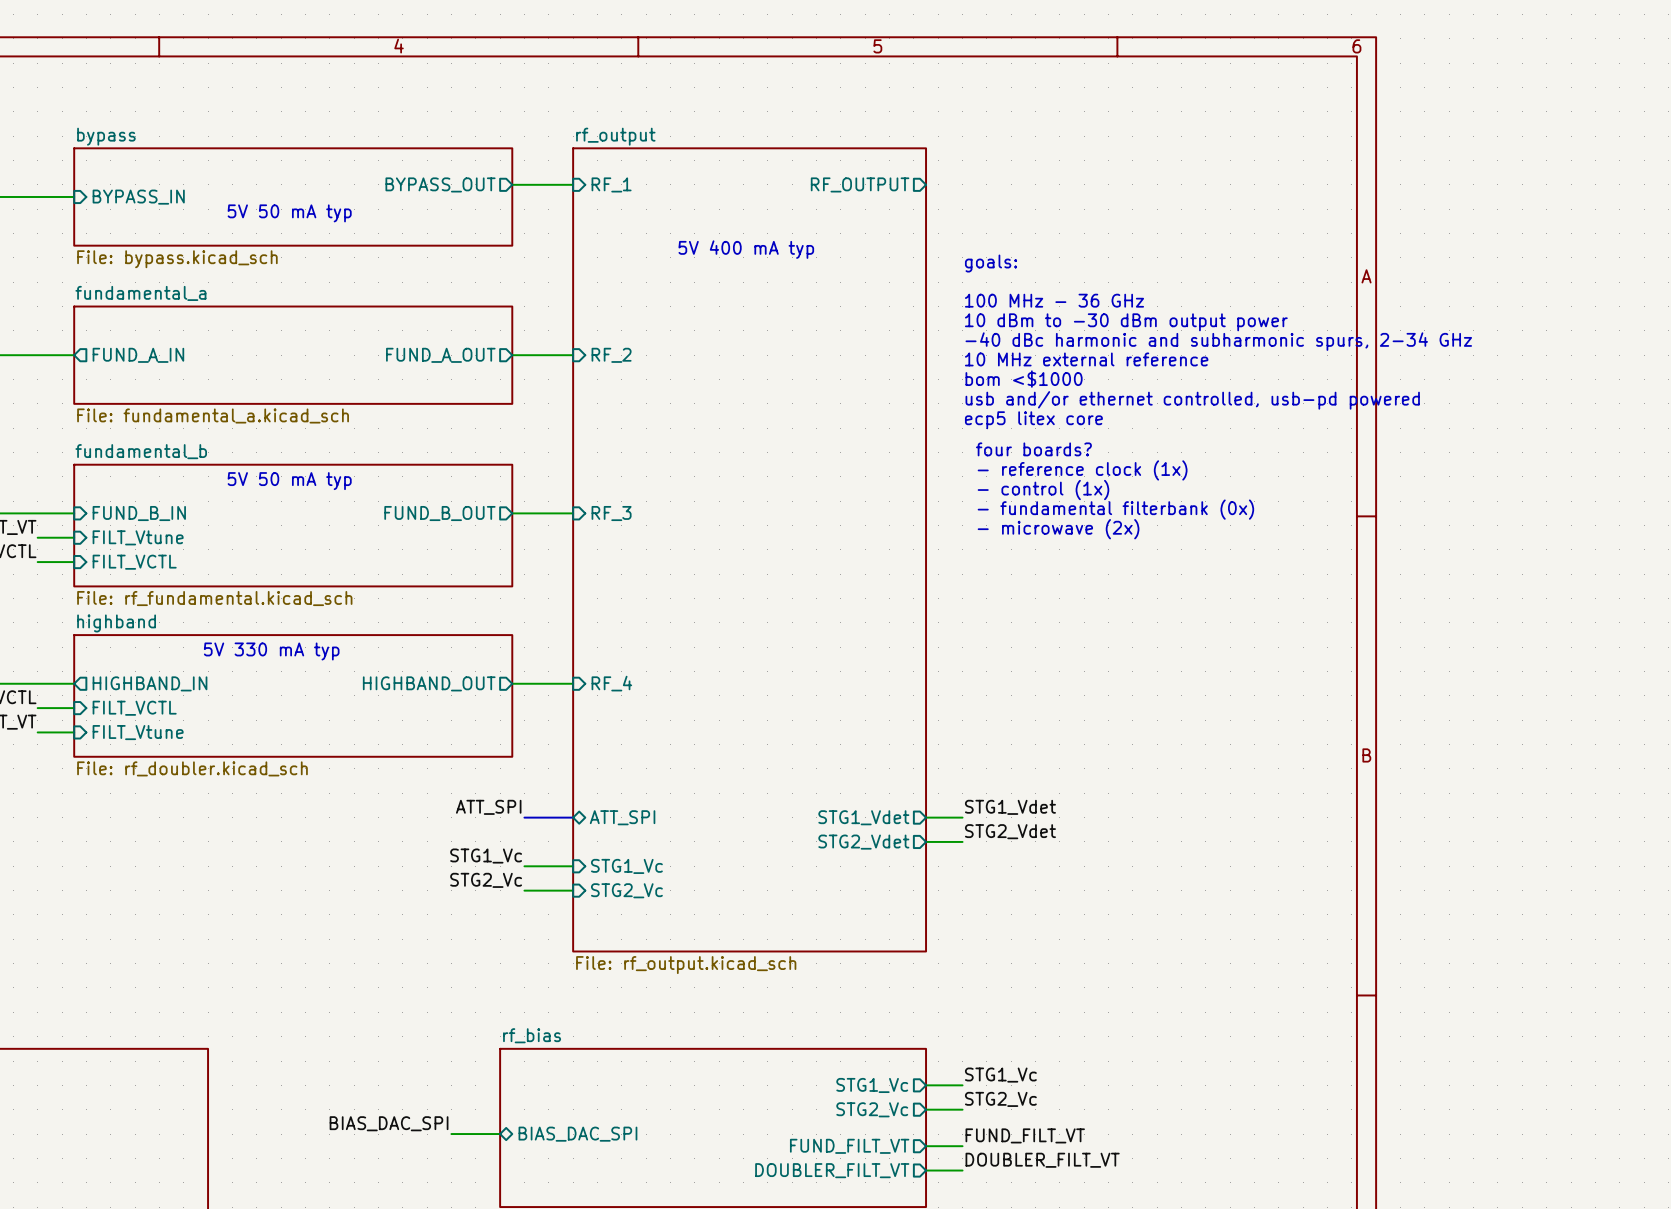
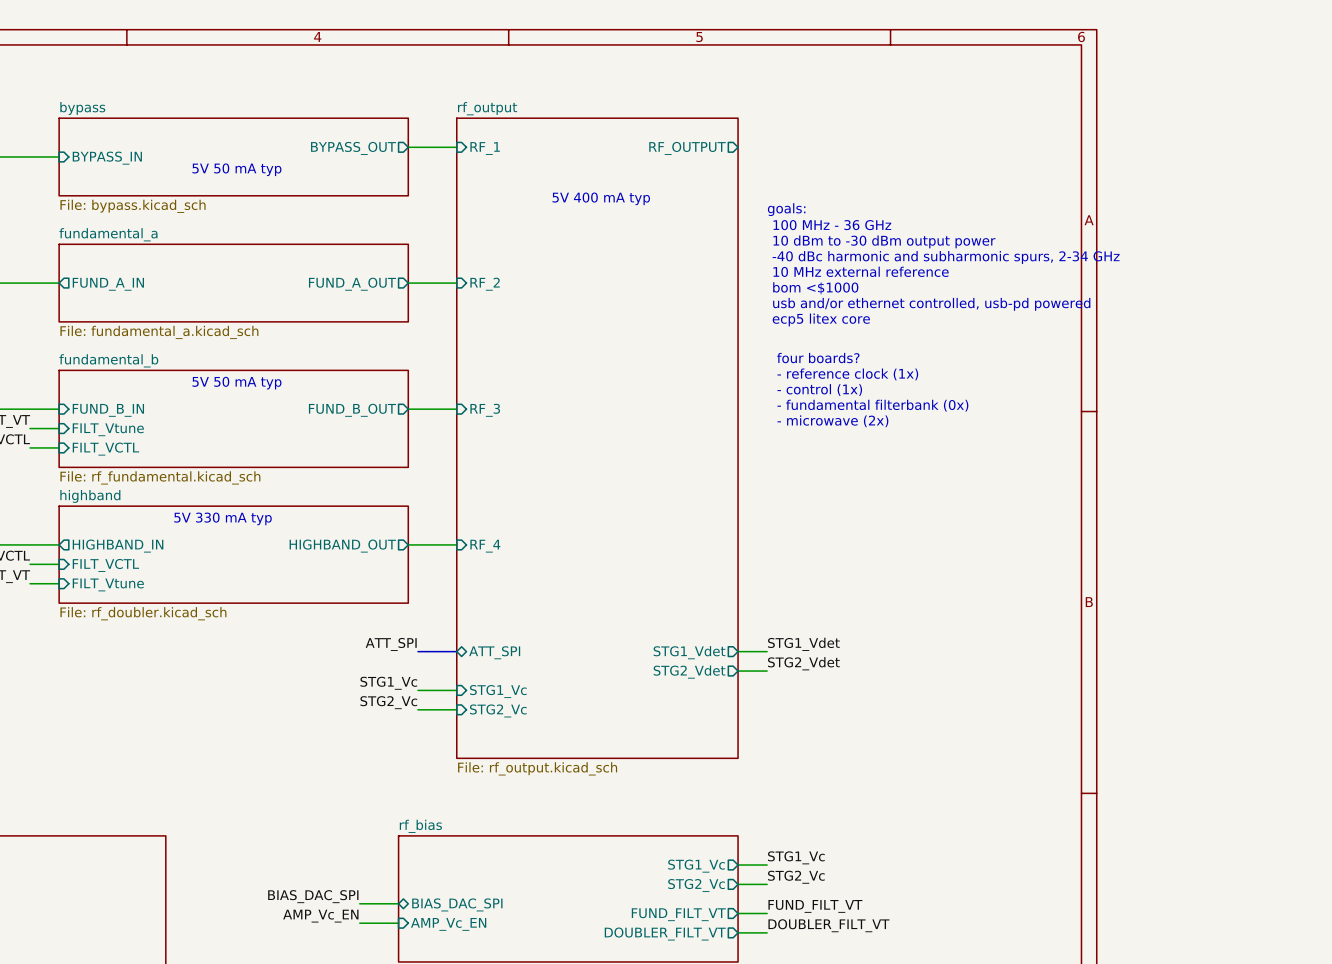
text: none -> 100 MHz - 36 GHz (832, 225)
text: 100 MHz - 36 GHz (1054, 300) -> 10 dBm to -30 dBm output power (884, 241)
text: 10 dBm to -30 dBm output power (1126, 322) -> -40 dBc harmonic and subharmonic spurs, 2-34 GHz (946, 257)
text: -40 dBc harmonic and subharmonic spurs, 2-34 GHz (1218, 341) -> 10 MHz external reference (861, 271)
text: 10 MHz external reference (1086, 359) -> bom <$1000 (815, 288)
text: bom <$1000 (1024, 379) -> usb and/or ethernet controlled, usb-pd powered (931, 304)
text: usb and/or ethernet controlled, usb-pd powered (1192, 400) -> ecp5 litex core (821, 319)
text: ecp5 litex core (1033, 420) -> none
label: none -> AMP_Vc_EN (320, 916)
wire: none -> (359, 923) (398, 923)
sheet pin: none -> AMP_Vc_EN (448, 924)

